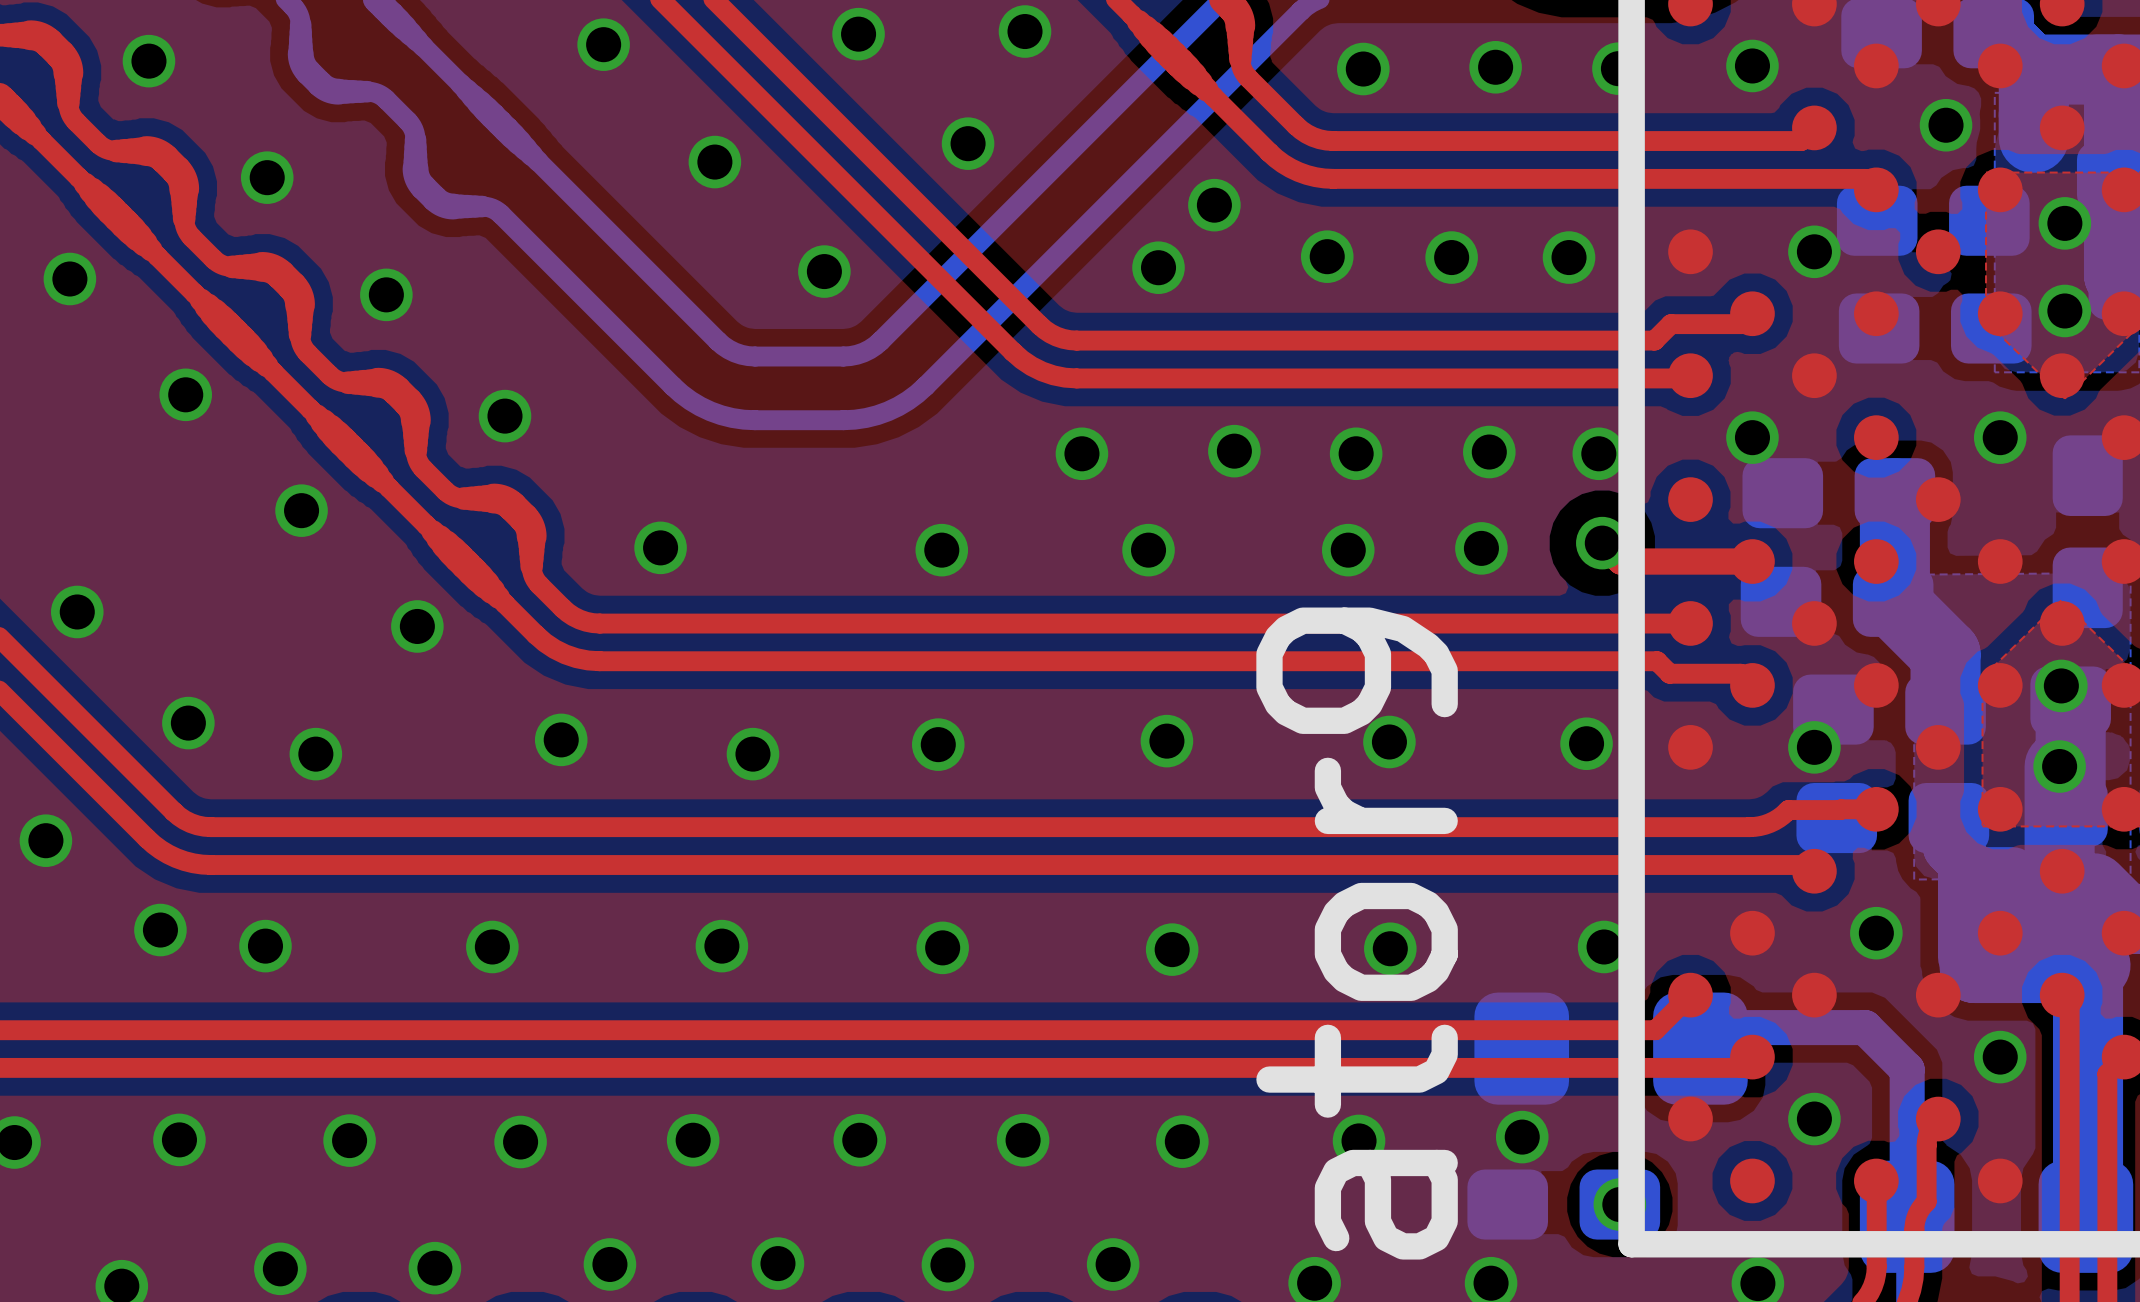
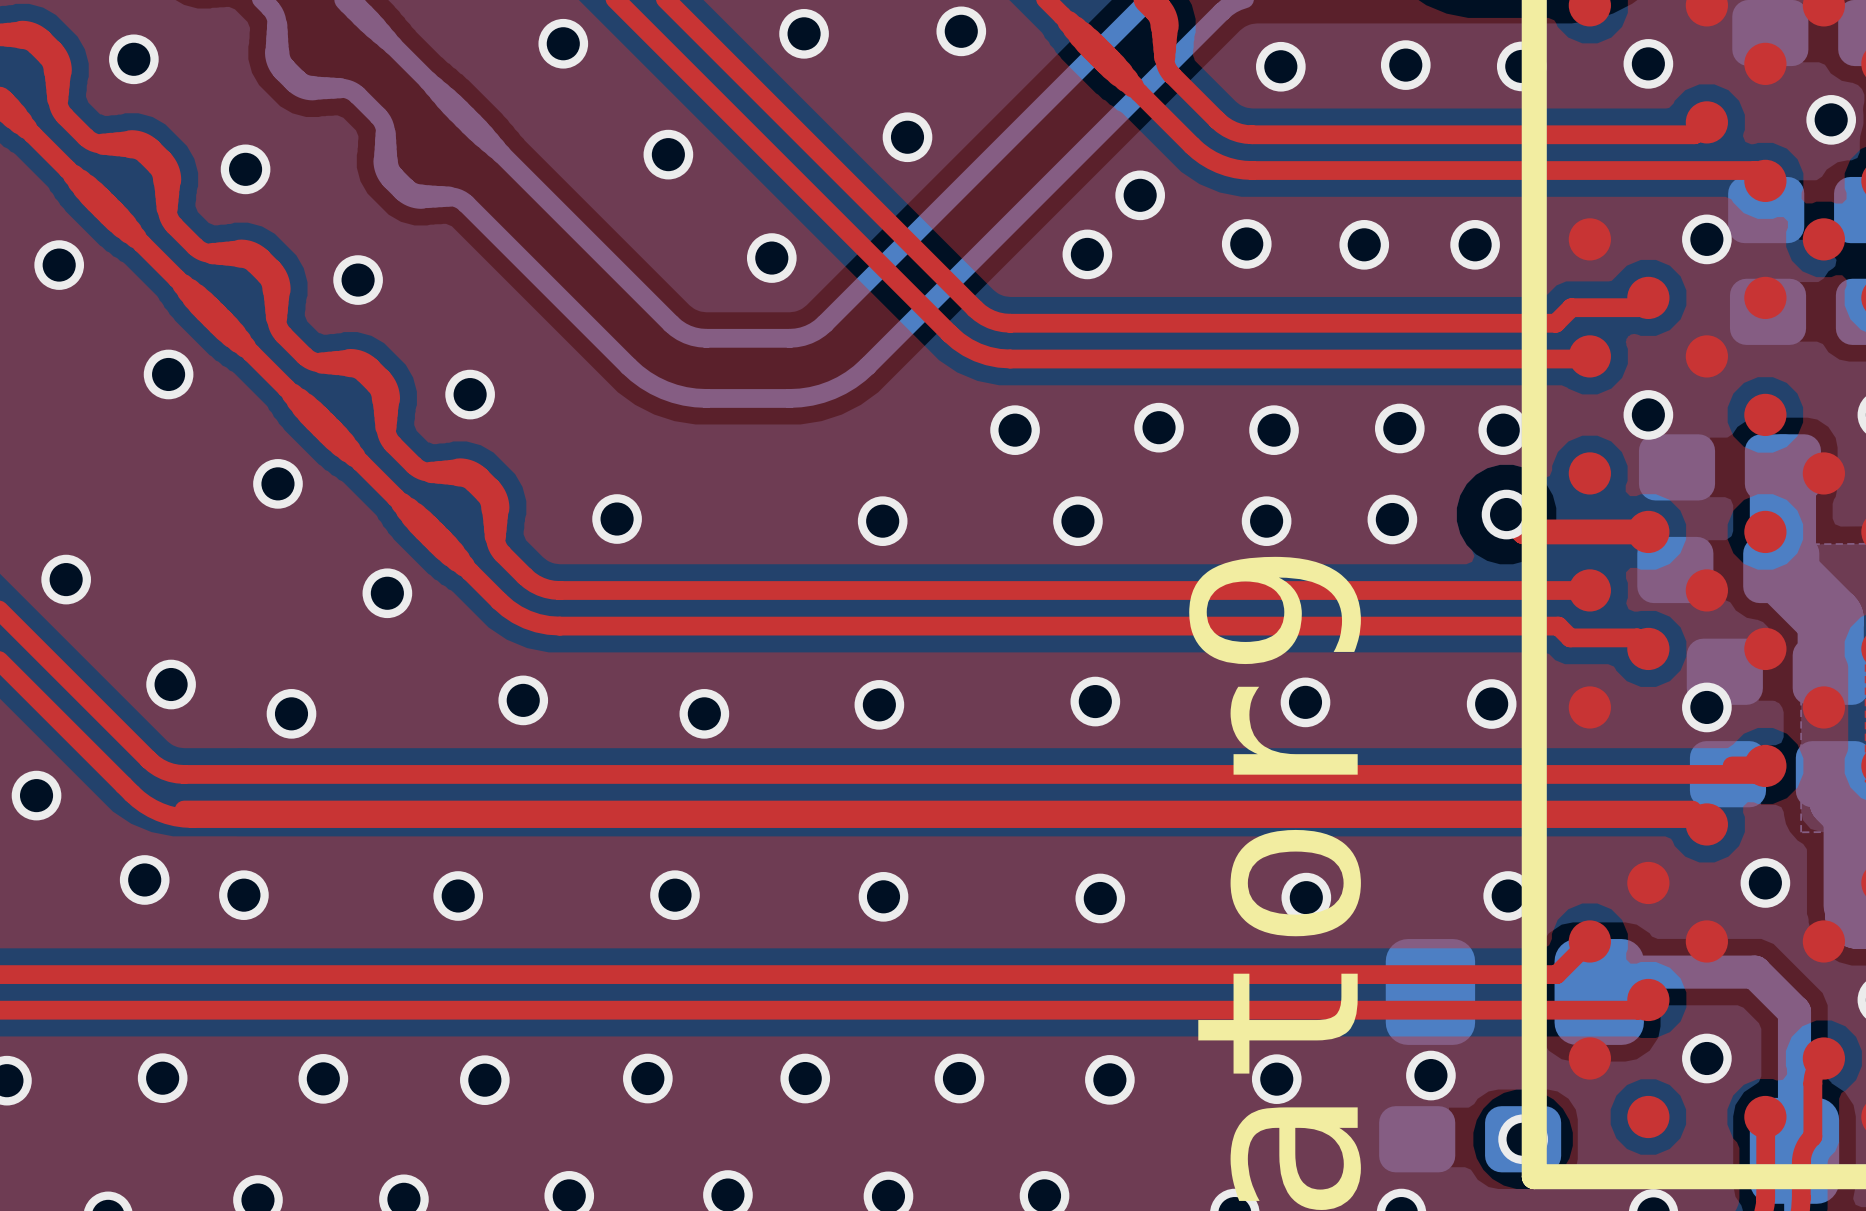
top track: (164, 802) (184, 820) (197, 825) (210, 827) (1749, 827) (1769, 823) (1786, 811) -> (148, 759) (165, 770) (184, 774) (1756, 774) (1765, 765)
top track: (1788, 810) (1840, 810) -> none
top track: none -> (184, 810) (1692, 810)

